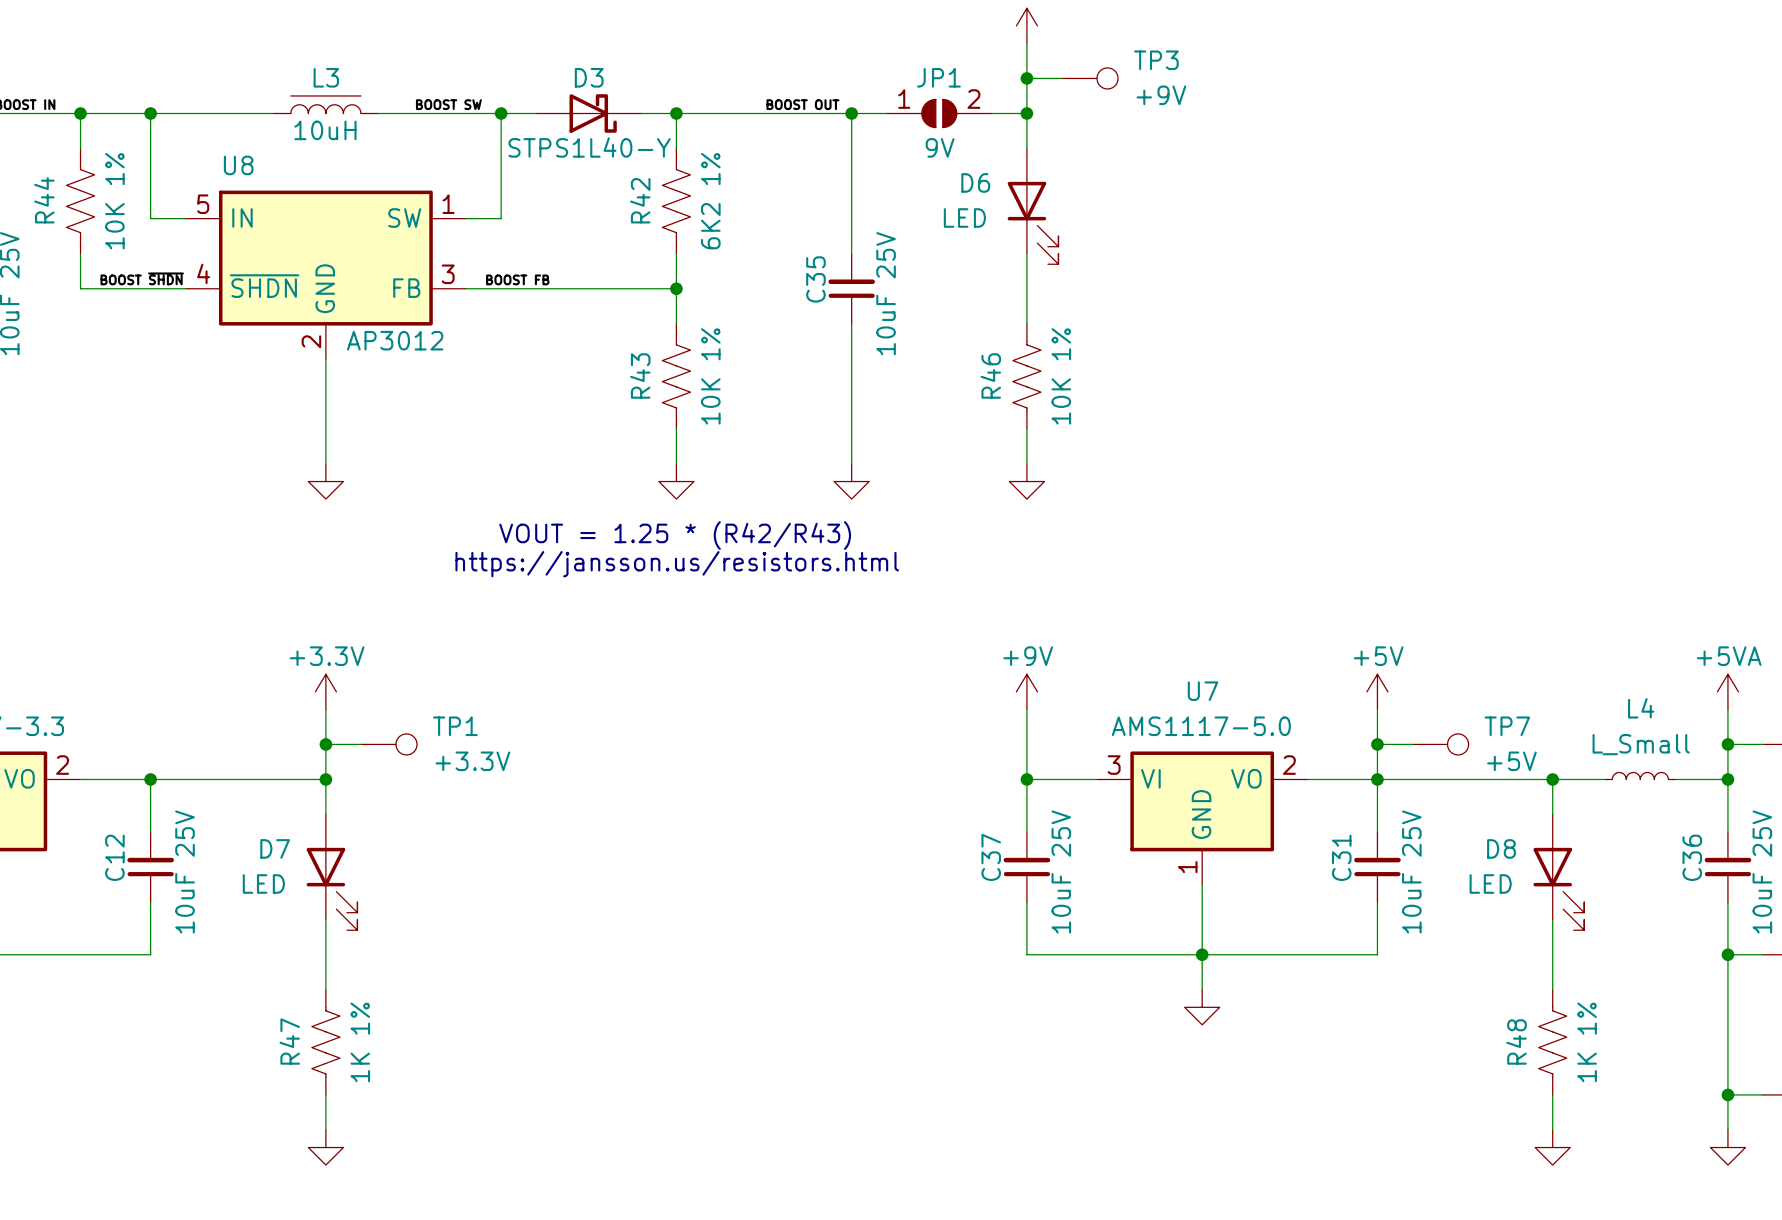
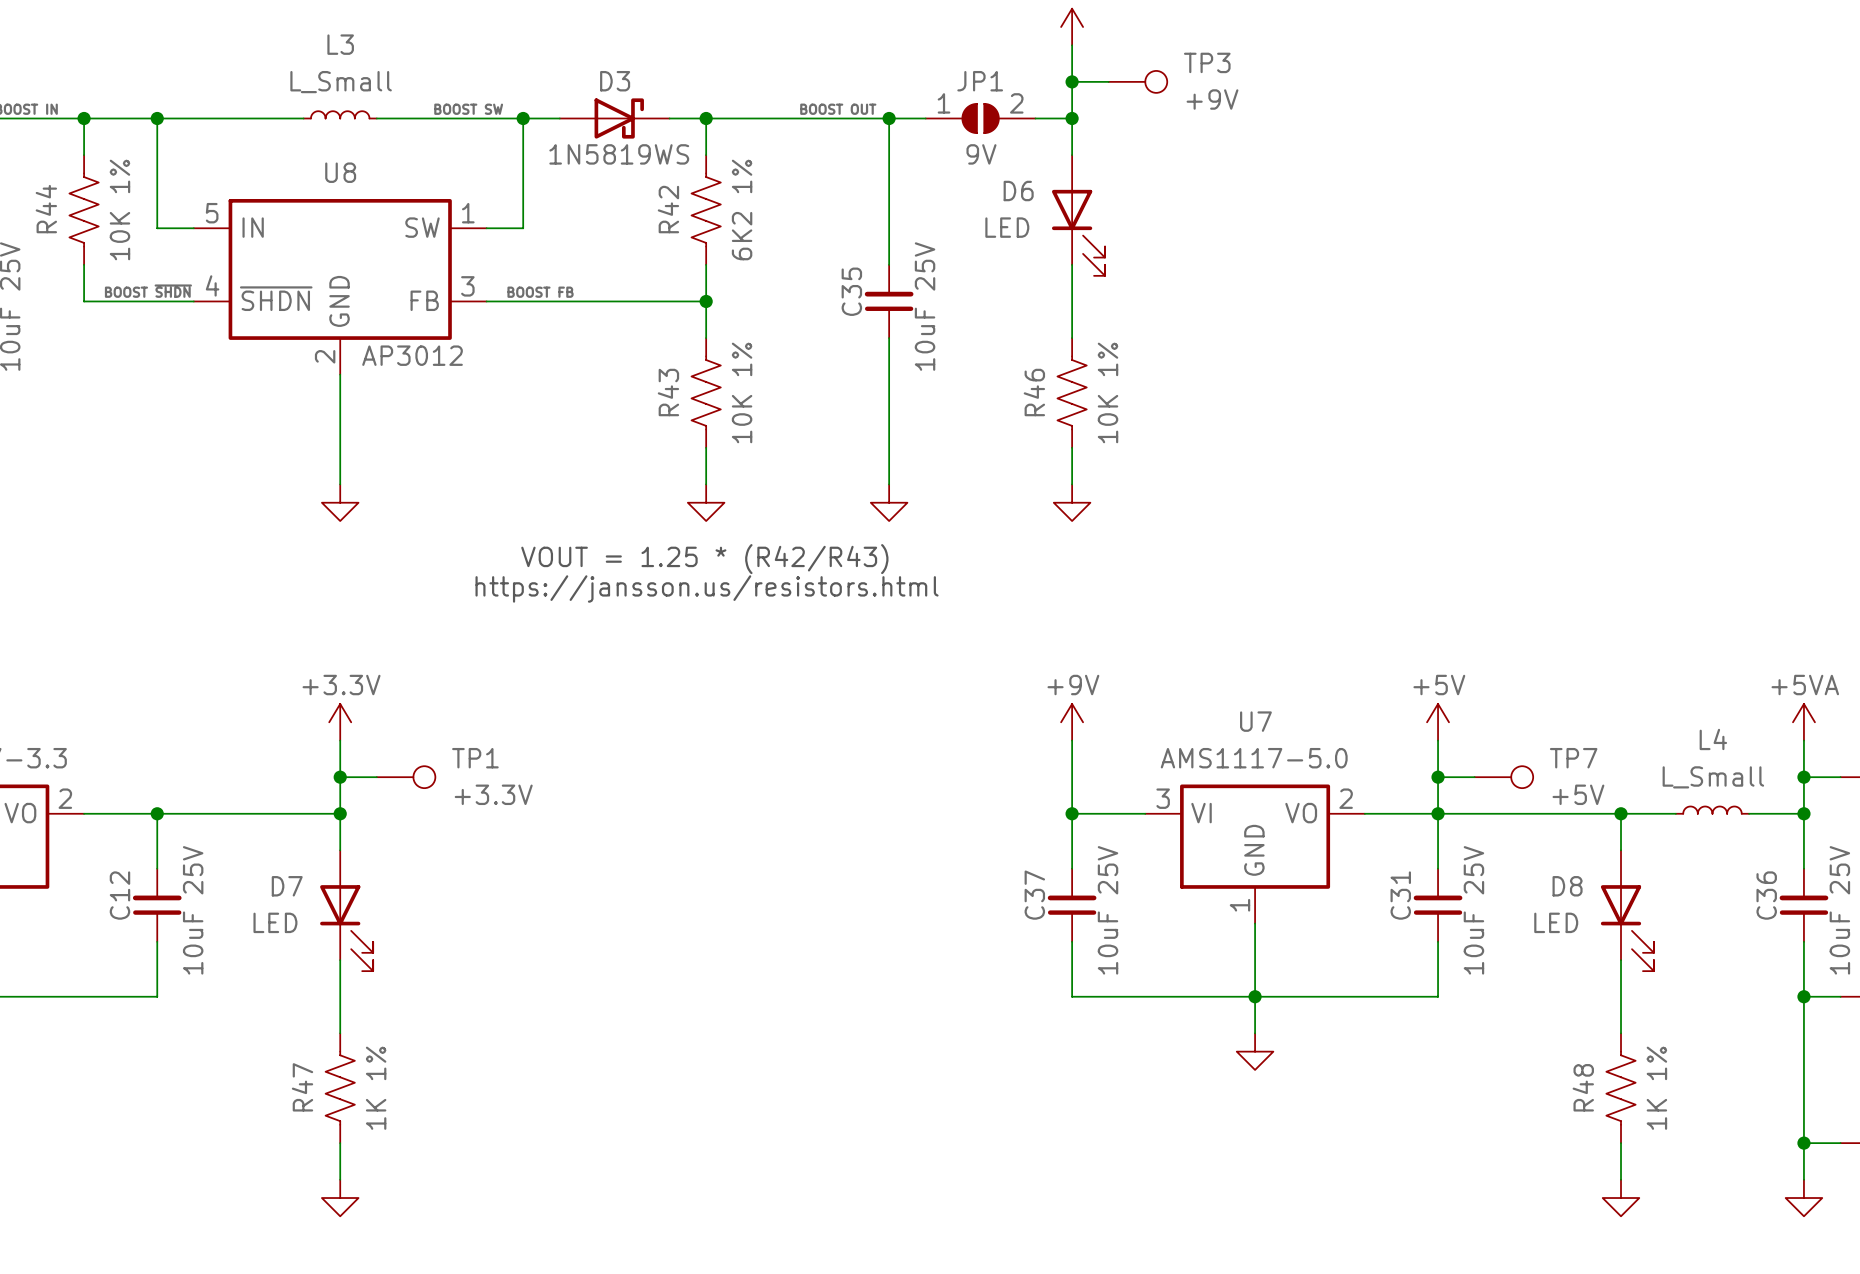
L3 name position: L3 (326, 77) -> L3 (340, 44)
L3 symbol: [273, 95, 379, 114] -> [303, 111, 377, 119]
D3 flip: as is (593, 113) -> up-down (619, 118)
L3 value: 10uH (325, 130) -> L_Small (341, 82)
D3 value: STPS1L40-Y (589, 147) -> 1N5819WS (619, 154)
U8 name position: U8 (238, 165) -> U8 (340, 172)

